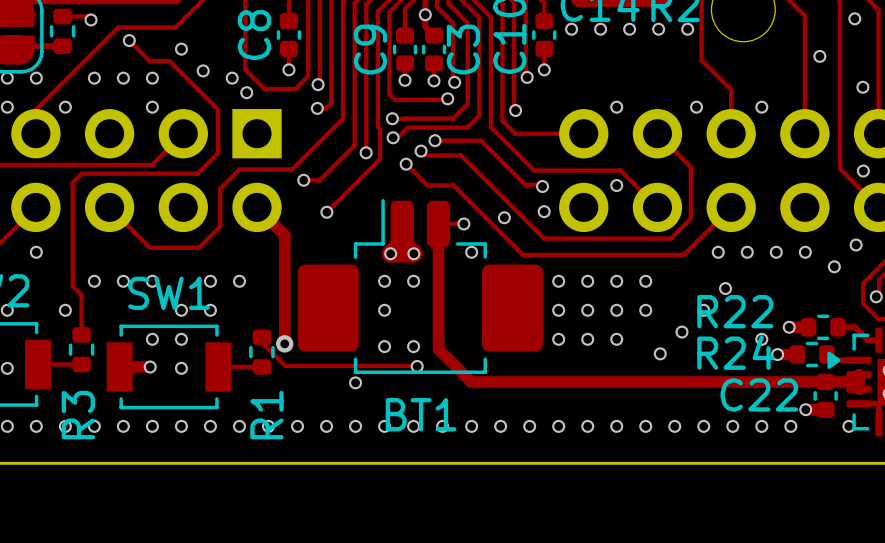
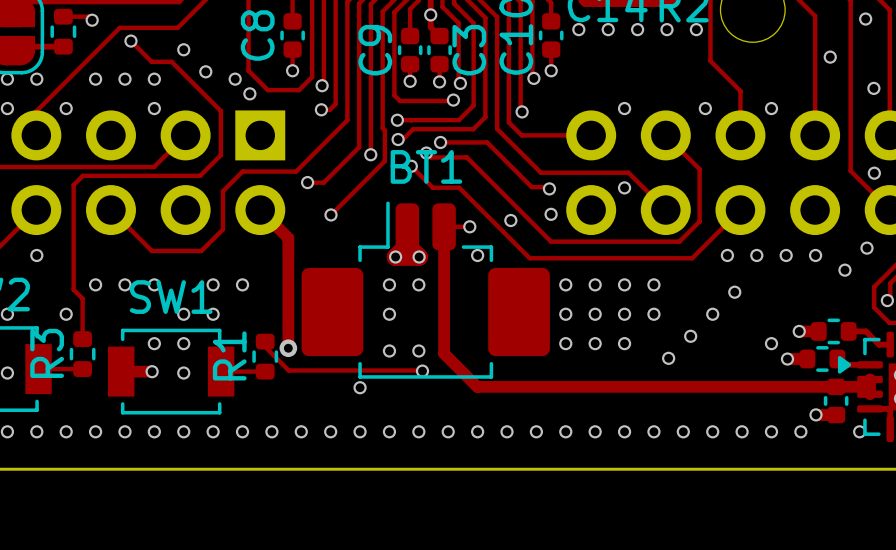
R22 name: R22 (735, 311) -> none
R24 name: R24 (736, 352) -> none
C22 name: C22 (759, 394) -> none
BT1 name position: BT1 (421, 414) -> BT1 (426, 166)
R3 name position: R3 (78, 415) -> R3 (47, 353)
R1 name position: R1 (266, 415) -> R1 (229, 355)

